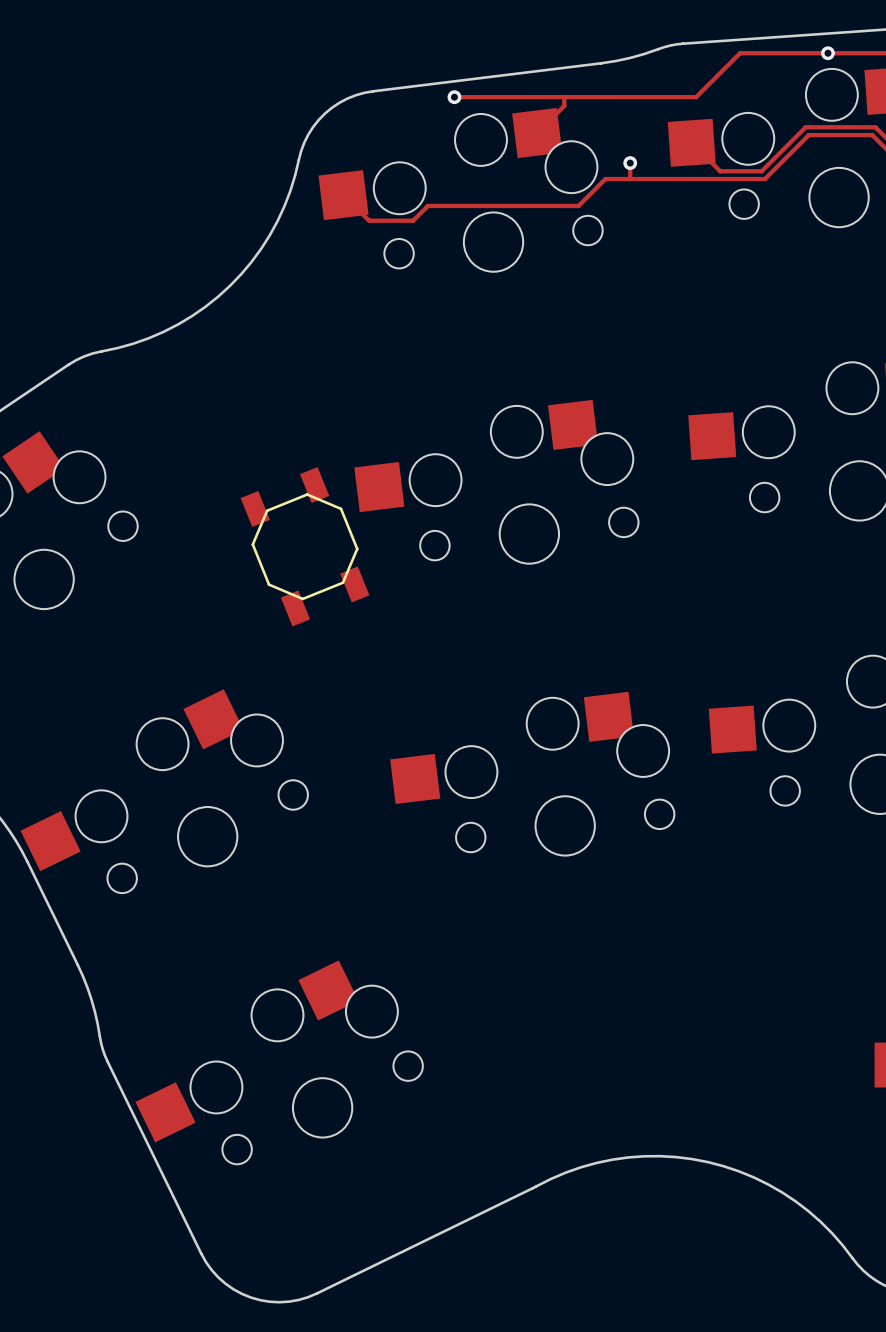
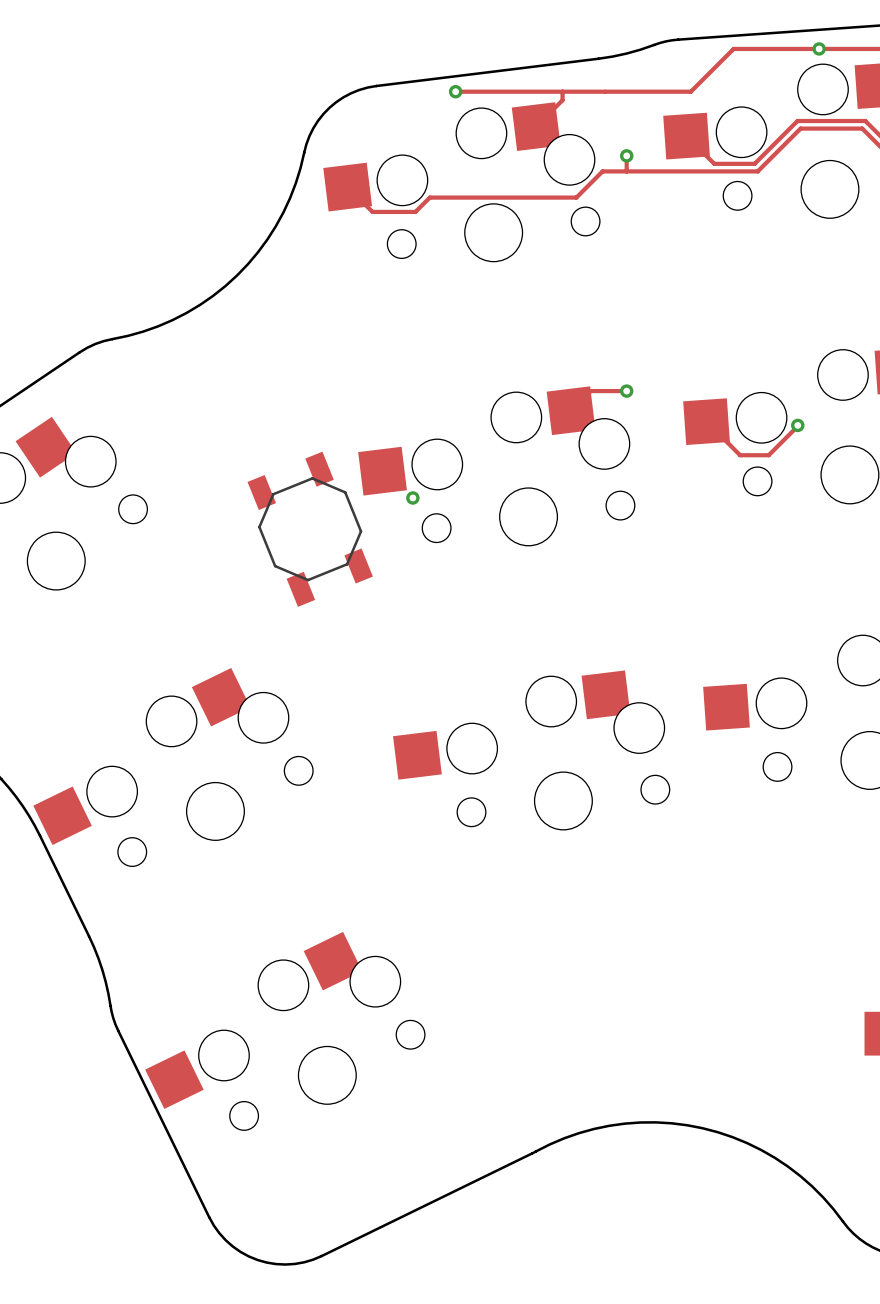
track: none -> (626, 391) (590, 391) (571, 410)
via: none -> (626, 391)
track: none -> (706, 421) (740, 455) (768, 455) (797, 425)
via: none -> (797, 425)
via: none -> (412, 498)

